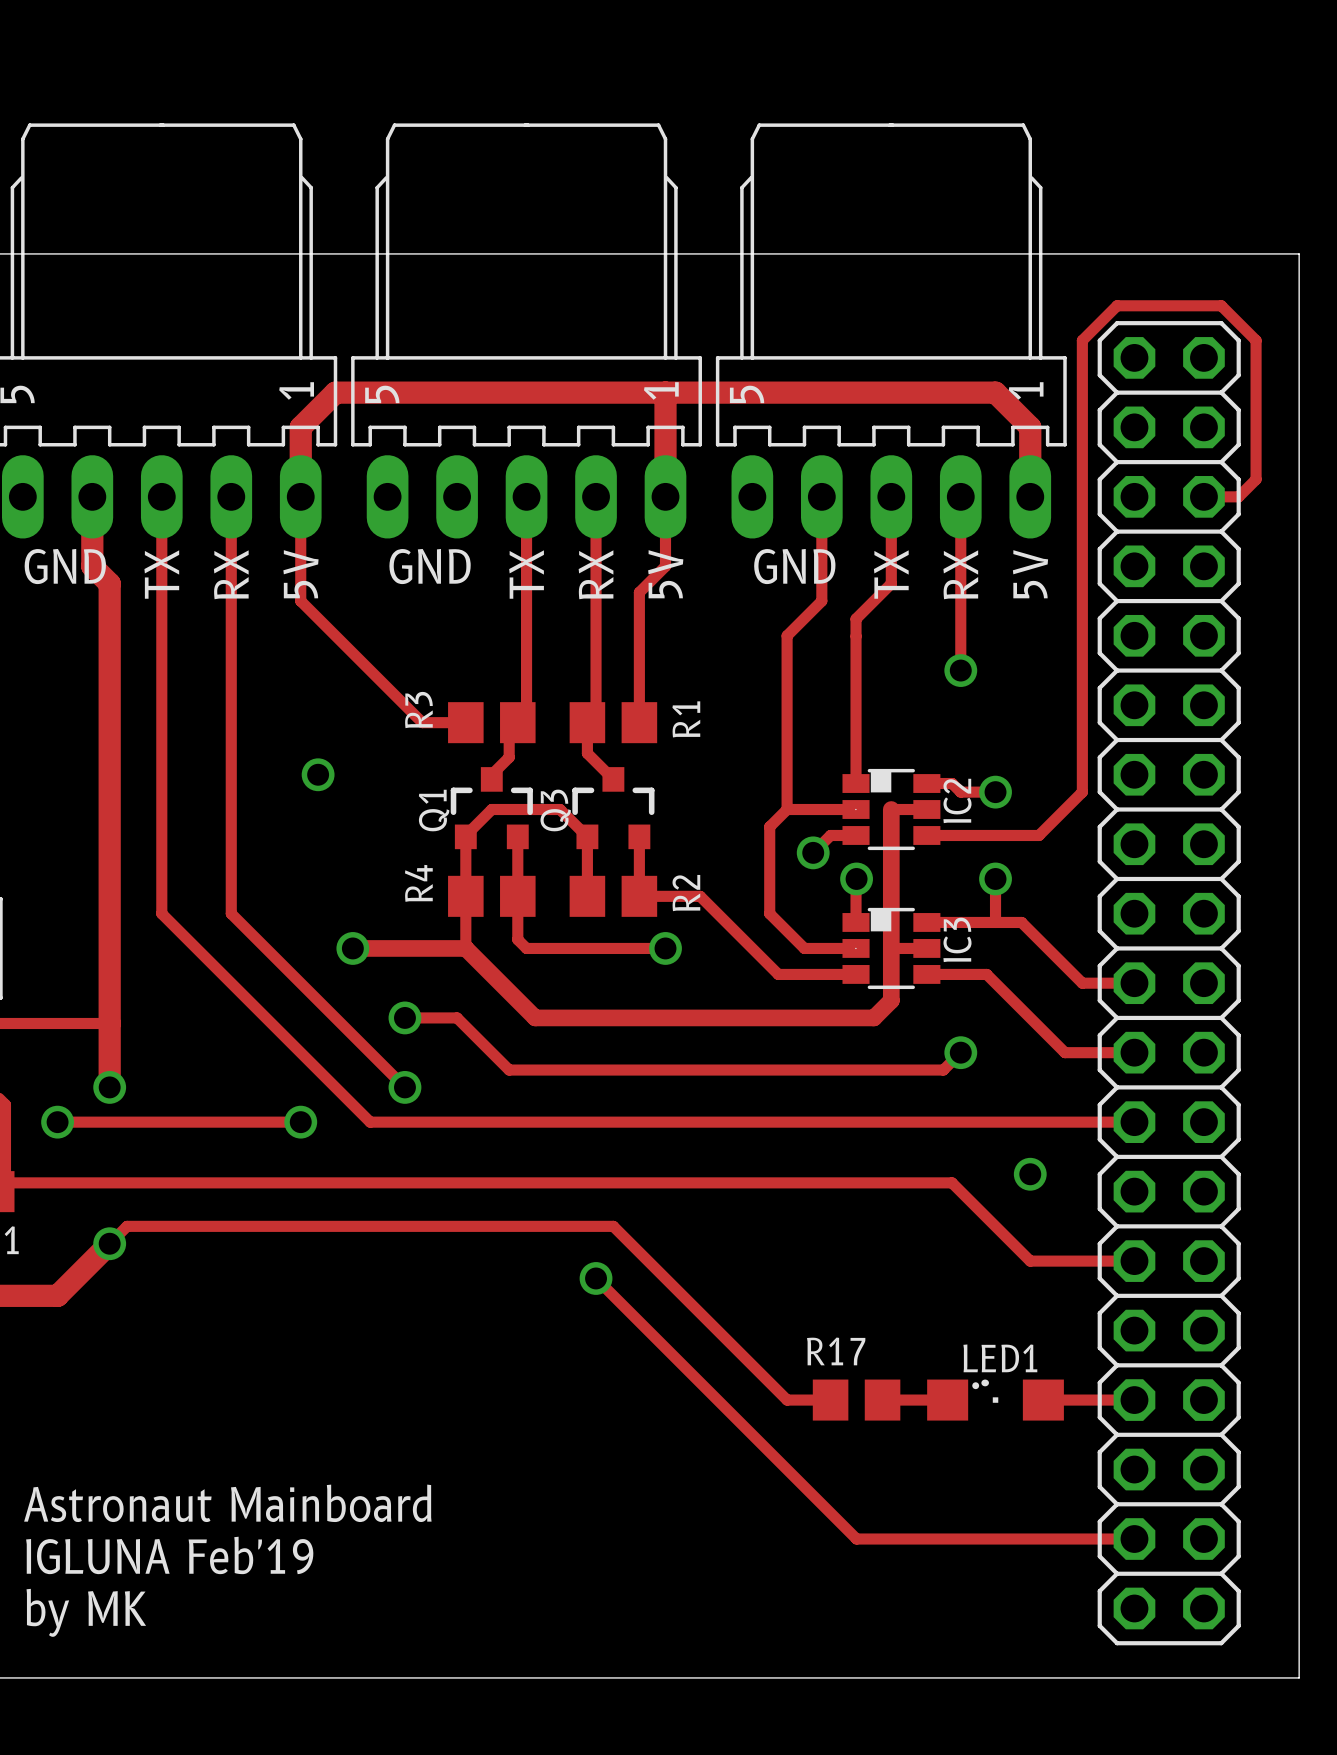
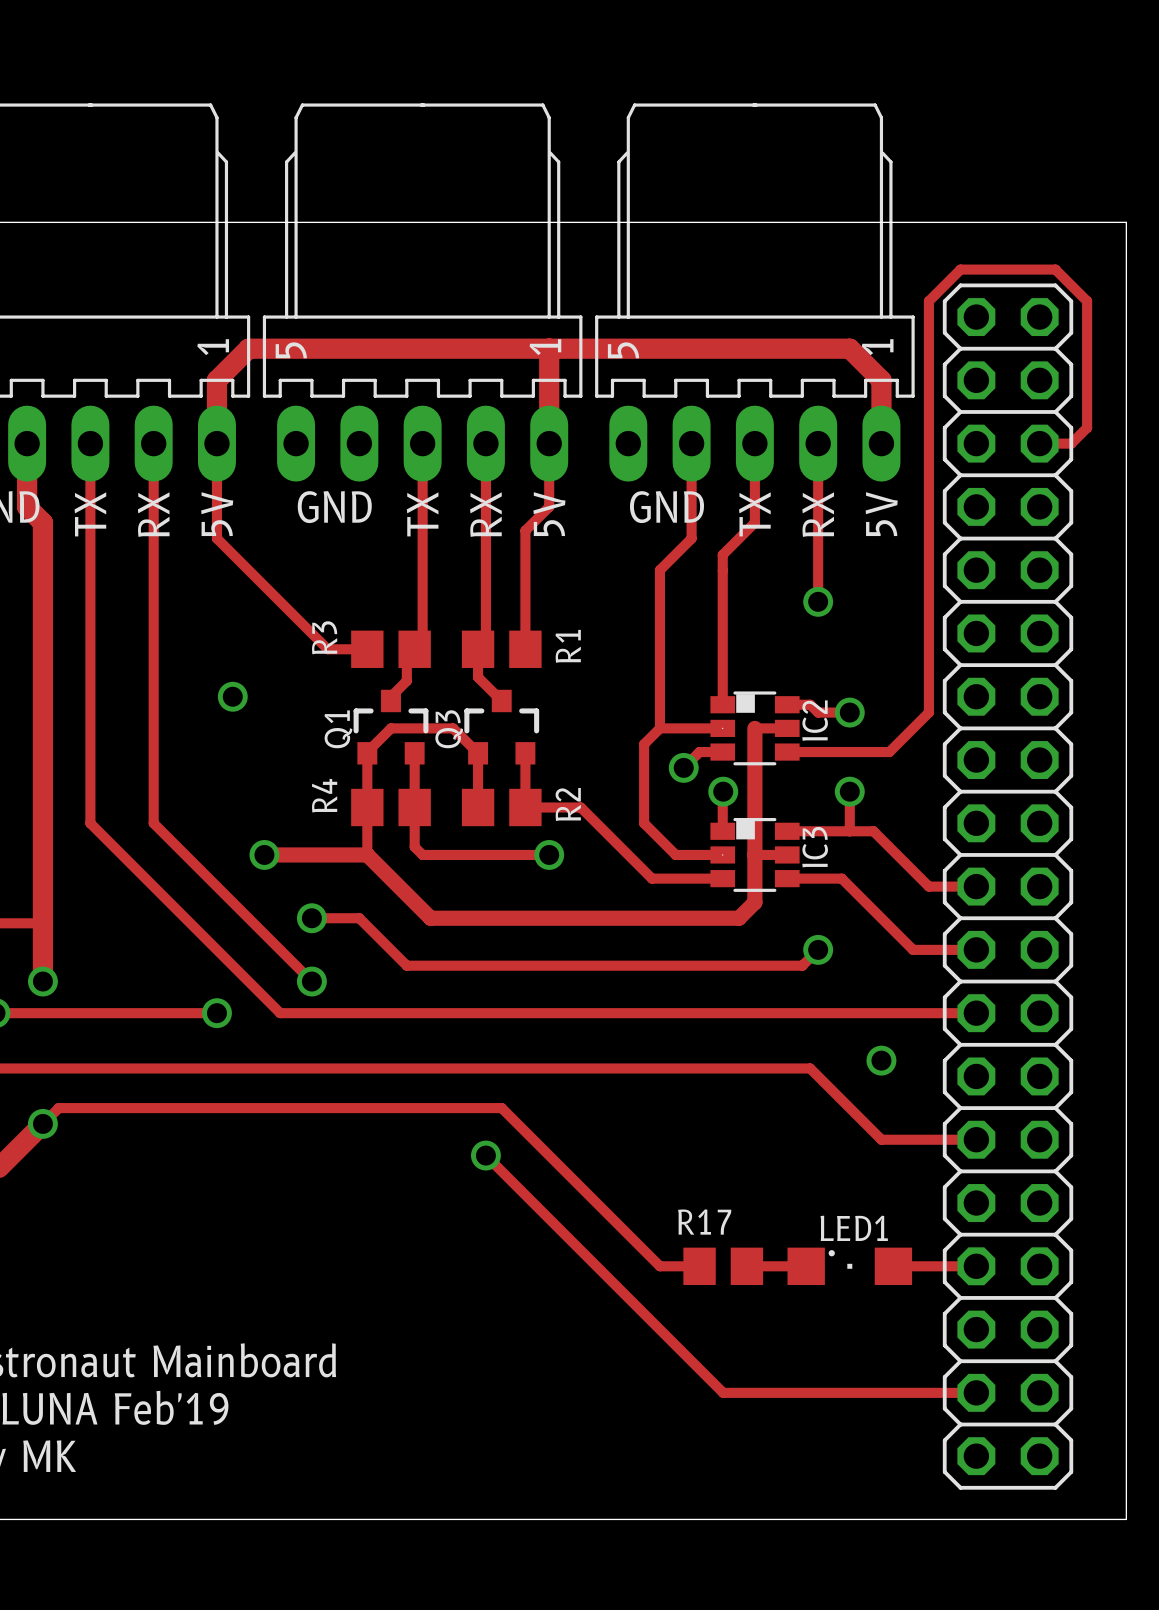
text: . (985, 1382) -> none

